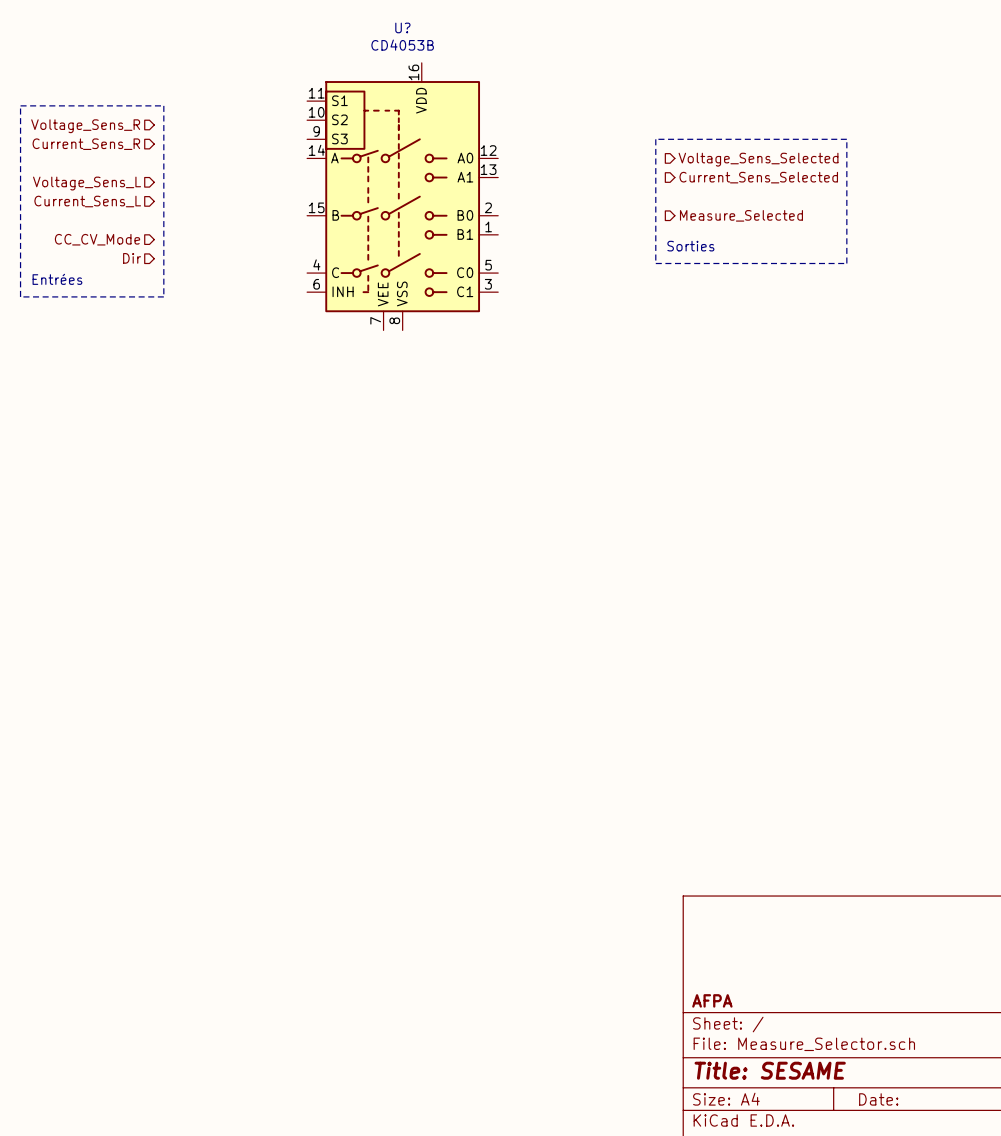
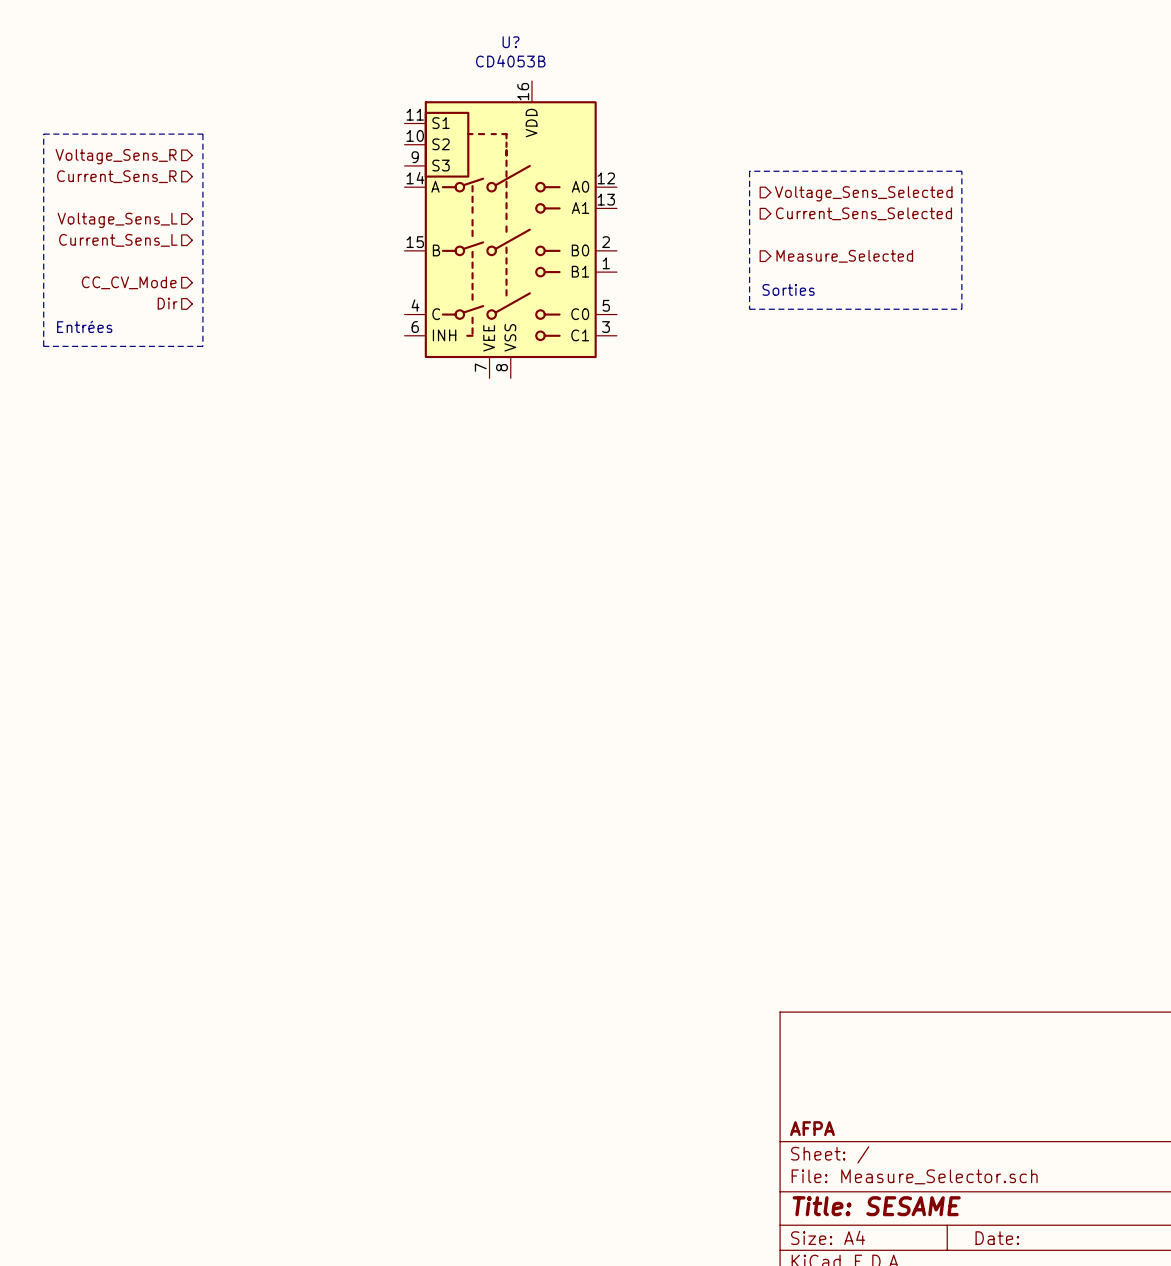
U? position: (402, 196) -> (510, 229)

